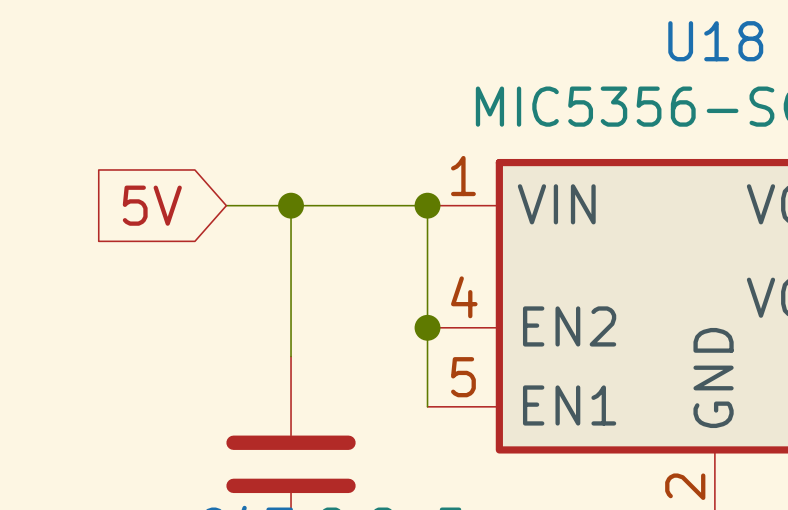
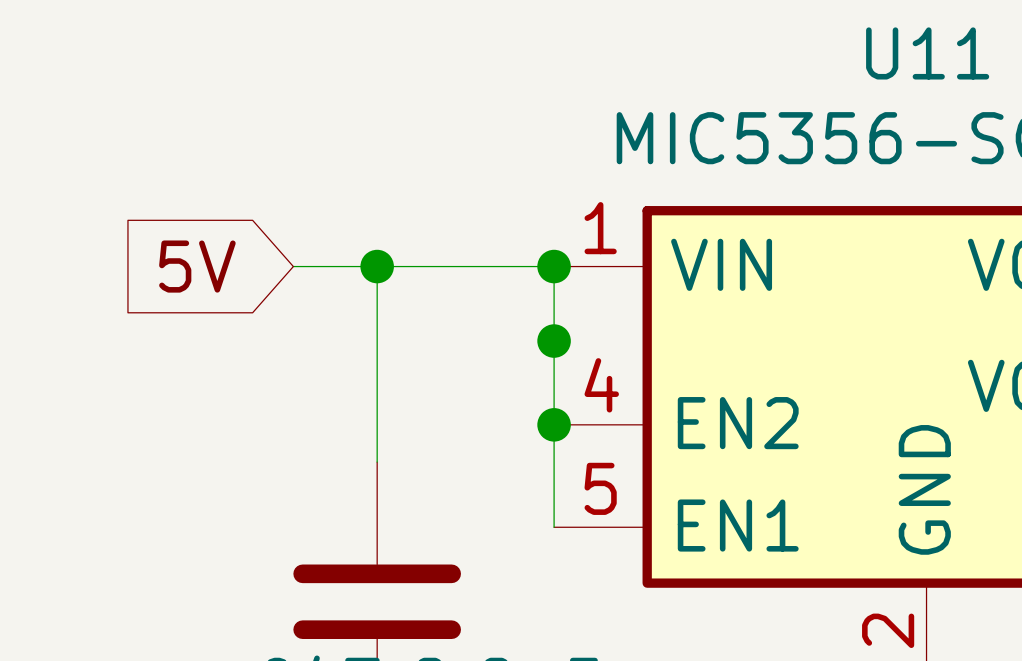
U18 name: U18 (715, 41) -> U11 (927, 53)
junction: none -> (554, 341)

